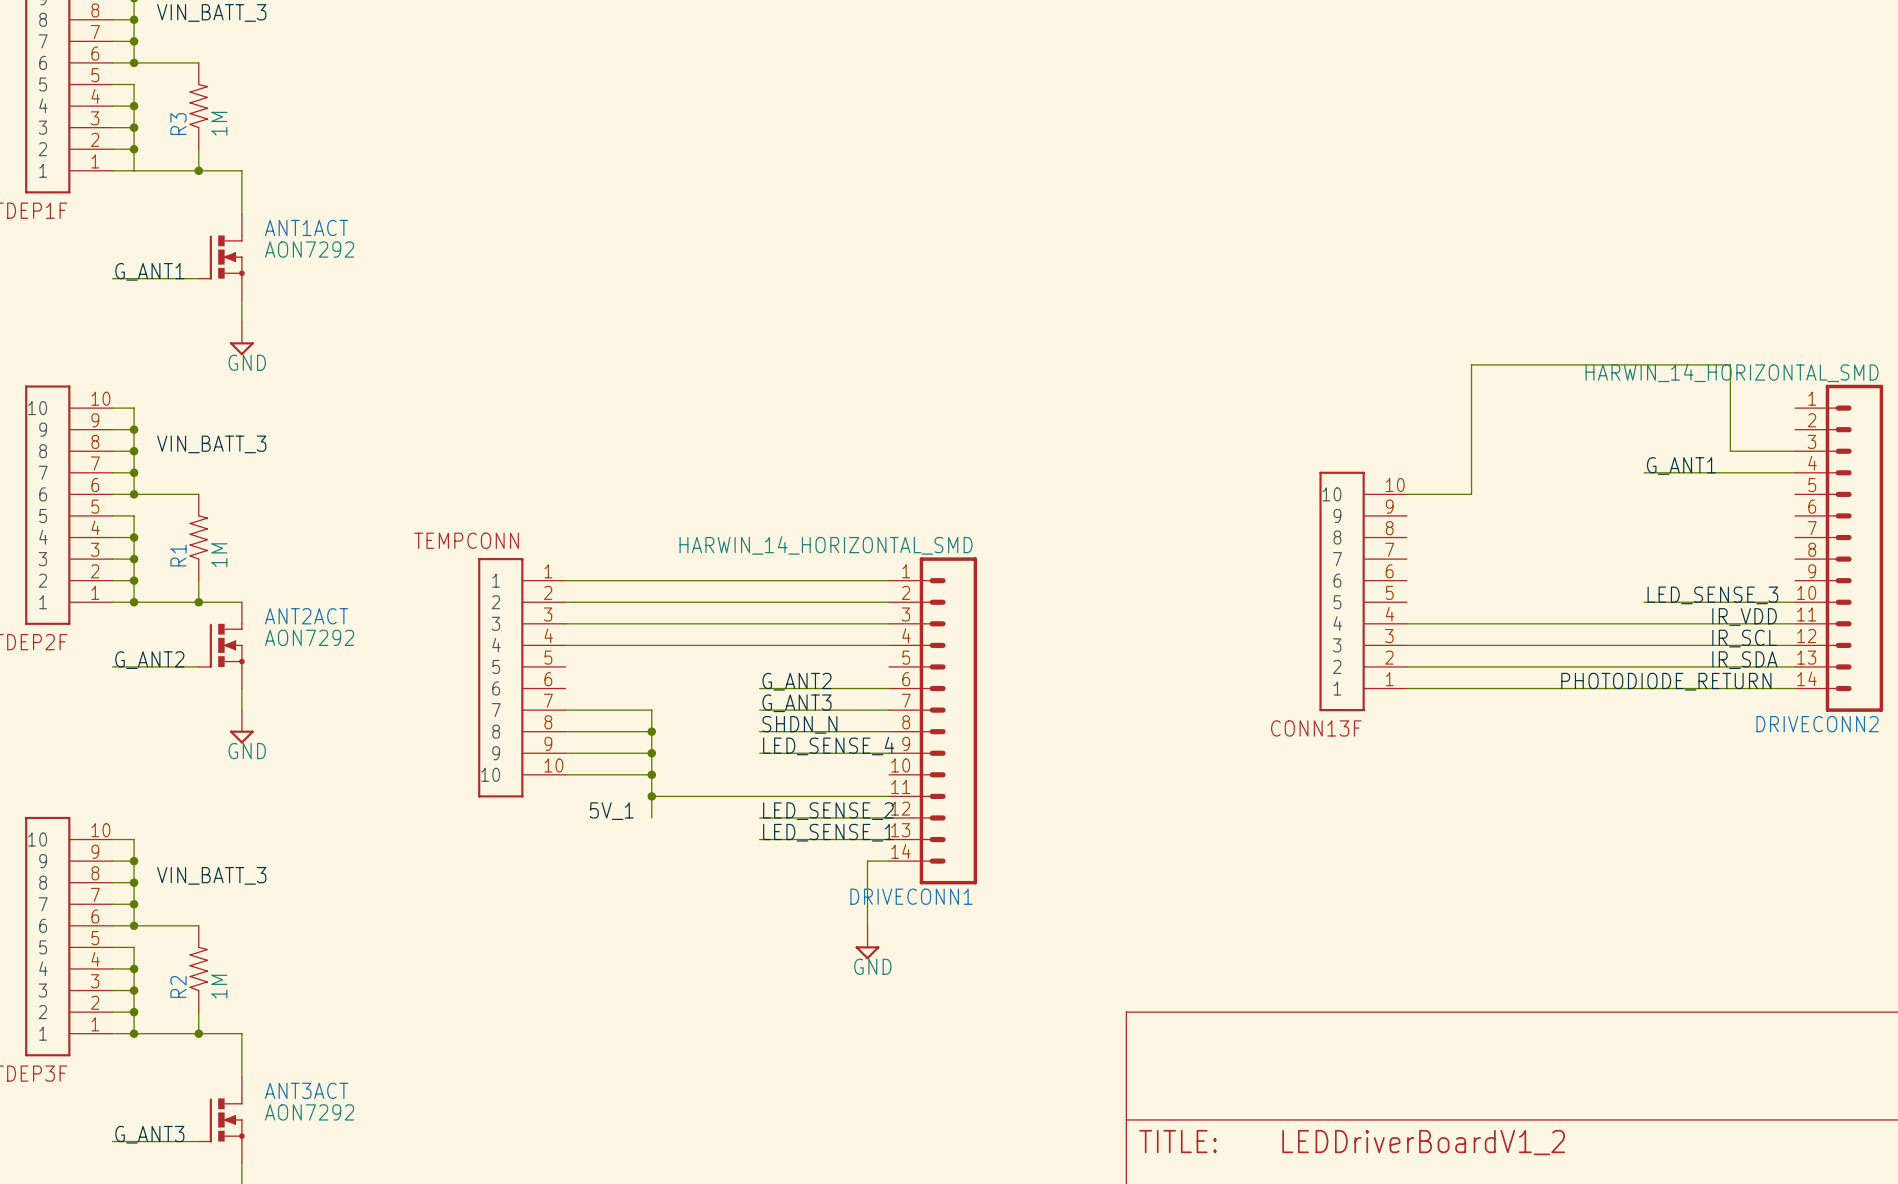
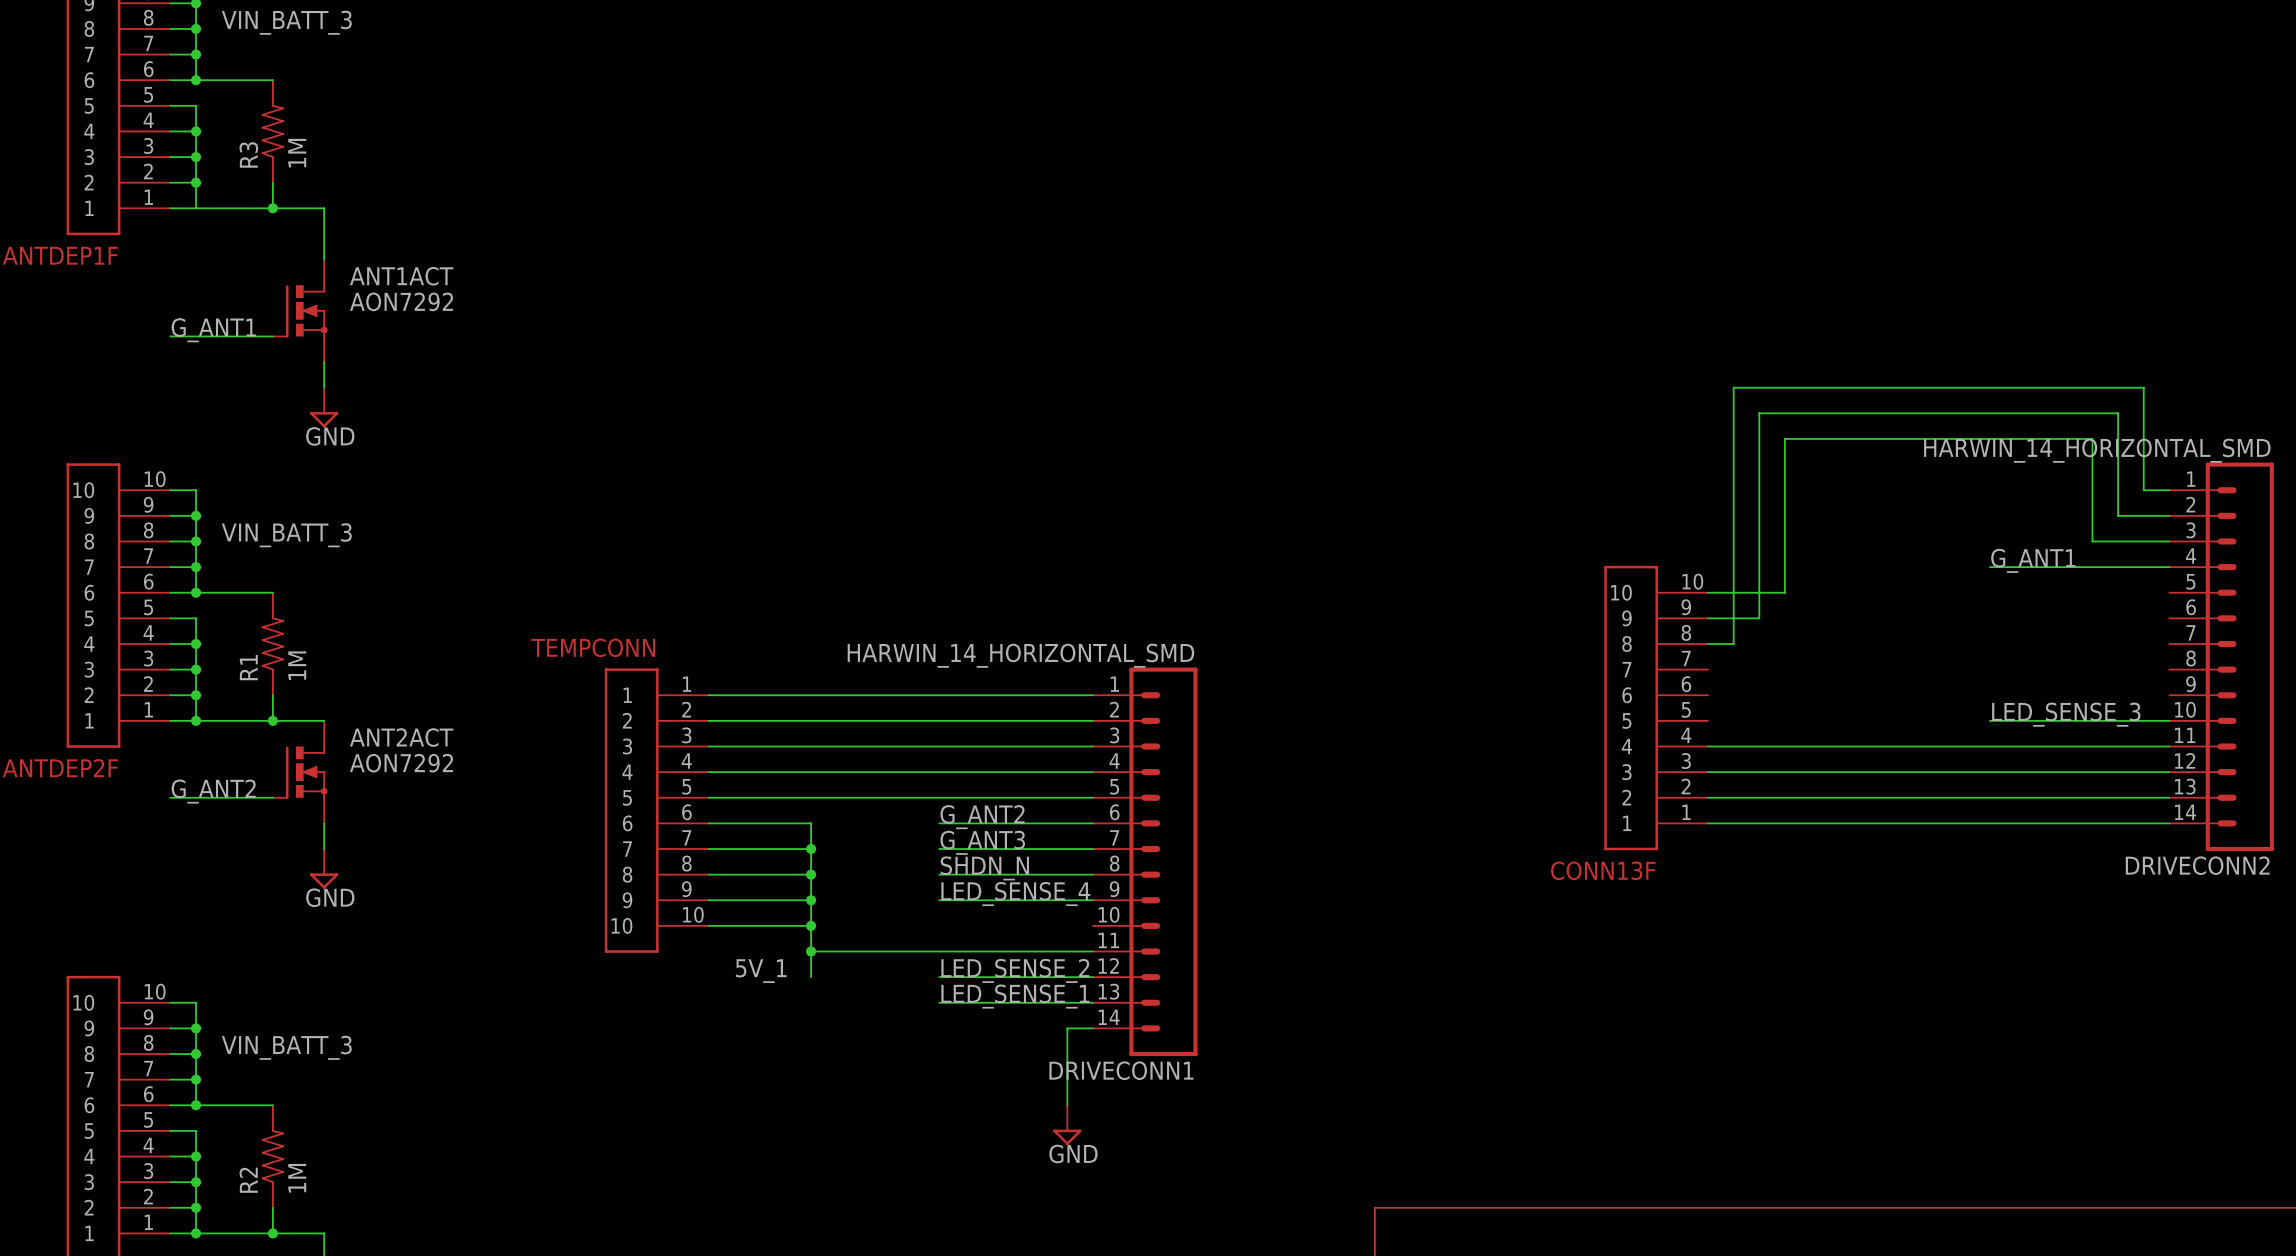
wire: none -> (2169, 490) (2143, 490) (2143, 387) (1733, 387) (1733, 643) (1708, 643)
wire: none -> (2169, 515) (2118, 515) (2118, 413) (1759, 413) (1759, 618) (1708, 618)
label: IR_VDD (1744, 616) -> none
label: IR_SCL (1744, 638) -> none
label: IR_SDA (1744, 660) -> none
wire: none -> (708, 797) (1092, 797)
label: PHOTODIODE_RETURN (1666, 681) -> none
wire: none -> (708, 823) (811, 823) (811, 849)
junction: none -> (811, 849)

